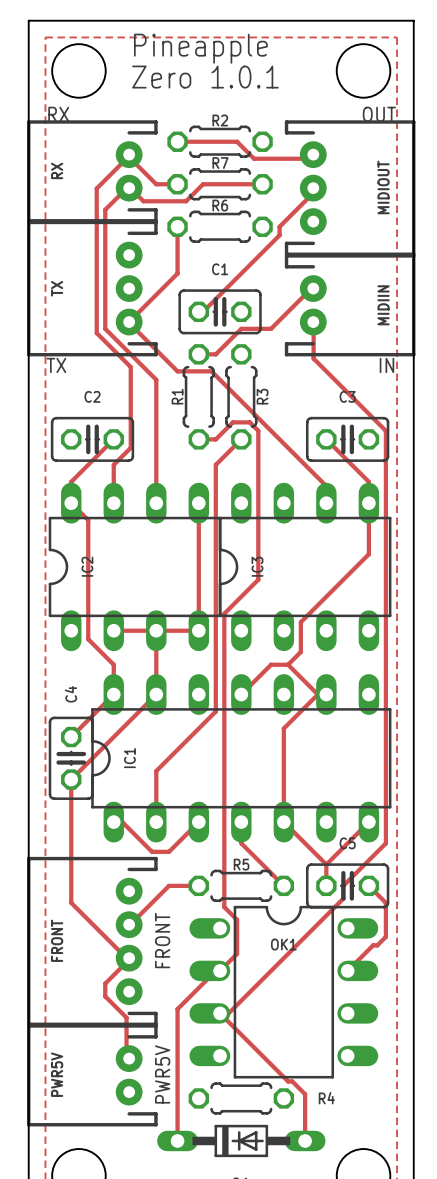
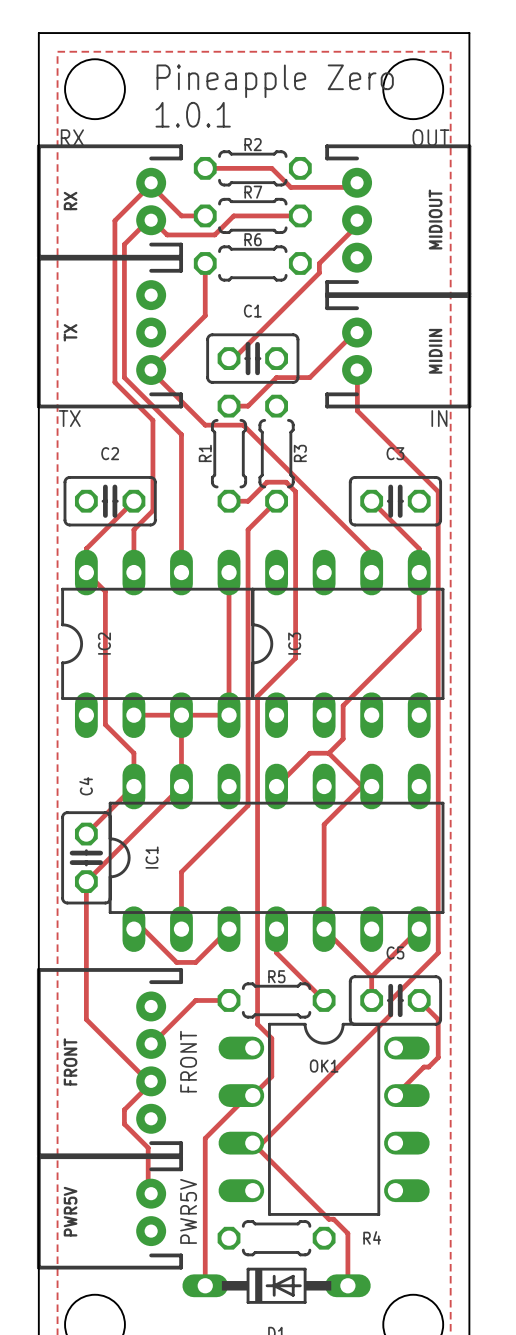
text: Pineapple (200, 48) -> Pineapple Zero (275, 81)
text: Zero 1.0.1 (205, 77) -> 1.0.1 (193, 114)

